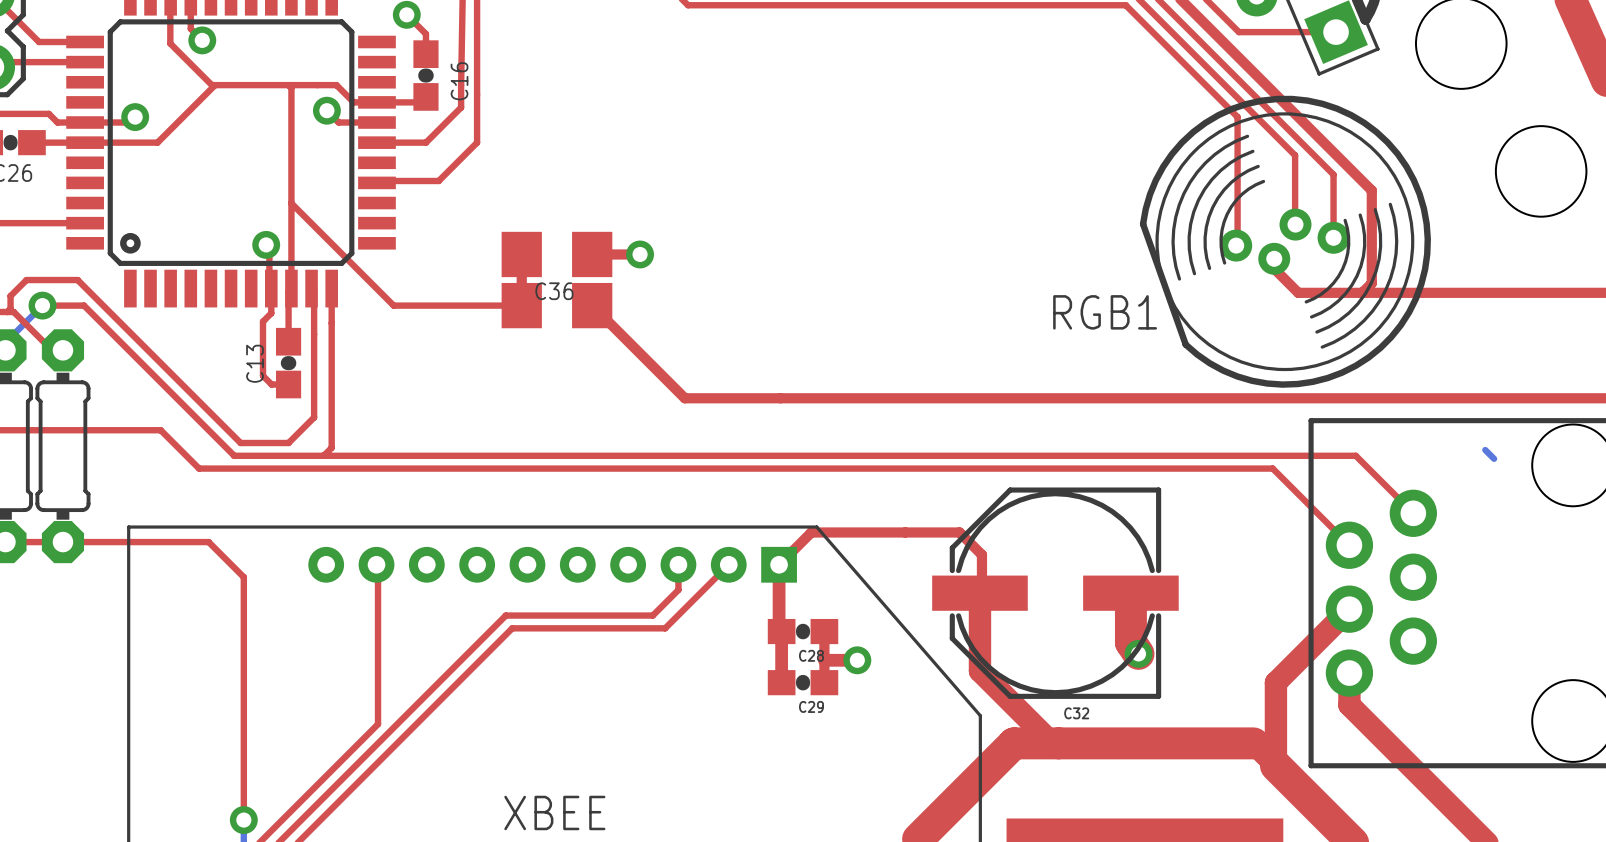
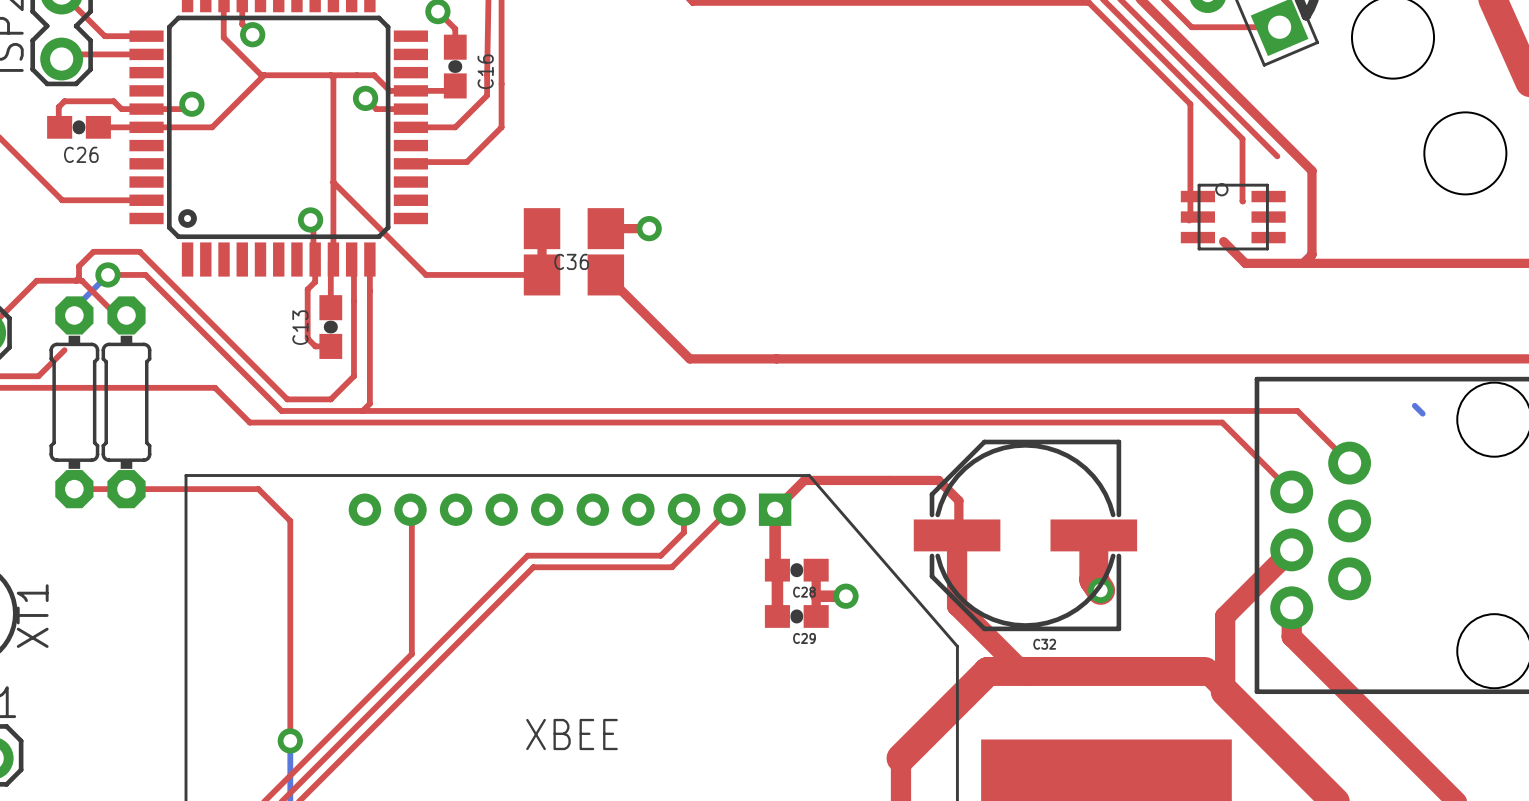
top track: (1333, 174) (1333, 237) -> none
part: none -> (1233, 216)
RGB1: (1285, 241) -> none

